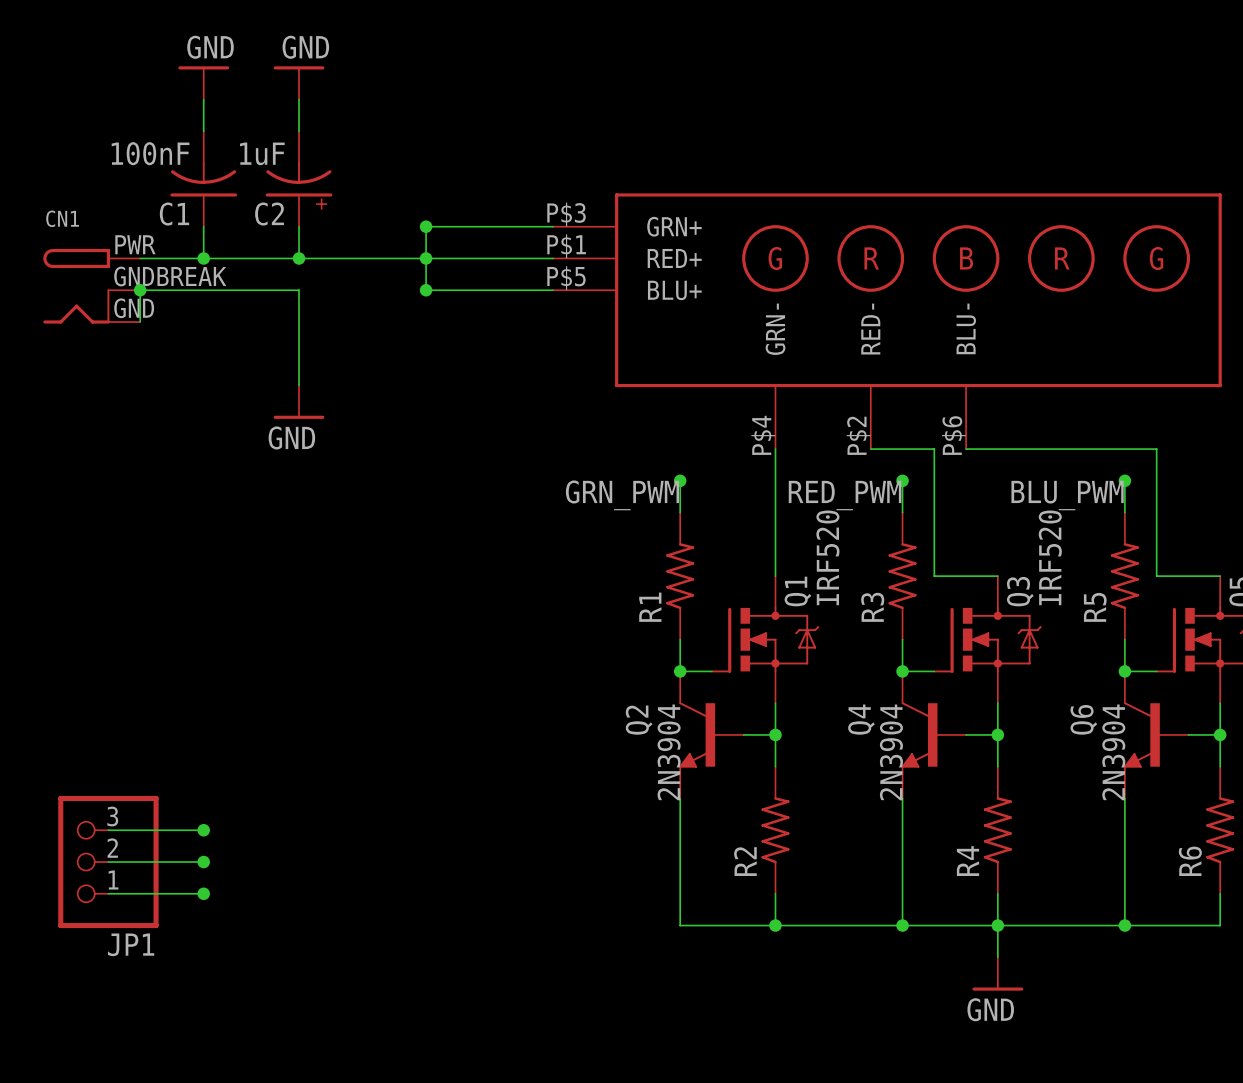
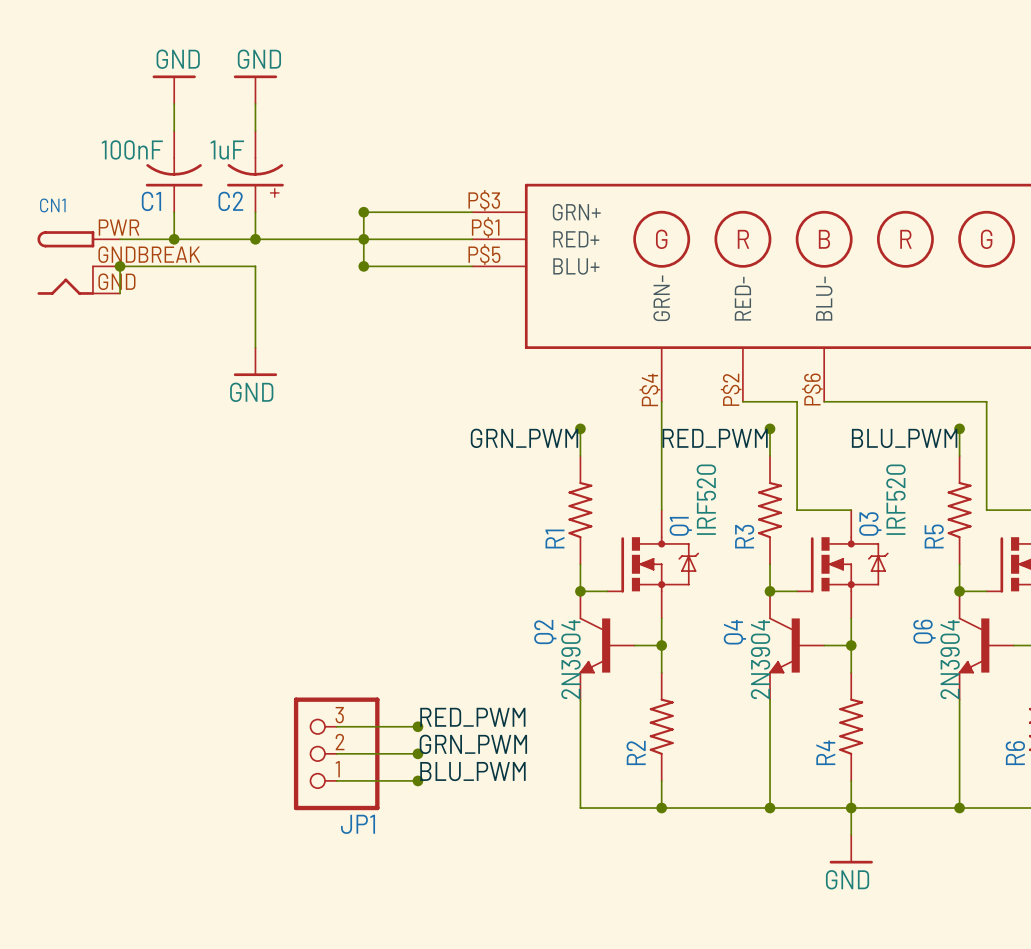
label: none -> RED_PWM (472, 717)
wire: (108, 830) (203, 830) -> (336, 726) (417, 726)
junction: (203, 830) -> none
junction: none -> (417, 726)
label: none -> GRN_PWM (473, 744)
wire: (108, 862) (203, 862) -> (336, 753) (417, 753)
JP1 position: (108, 862) -> (336, 753)
junction: (203, 862) -> none
junction: none -> (417, 753)
label: none -> BLU_PWM (472, 771)
wire: (108, 893) (203, 893) -> (336, 780) (417, 780)
junction: (203, 893) -> none
junction: none -> (417, 780)

